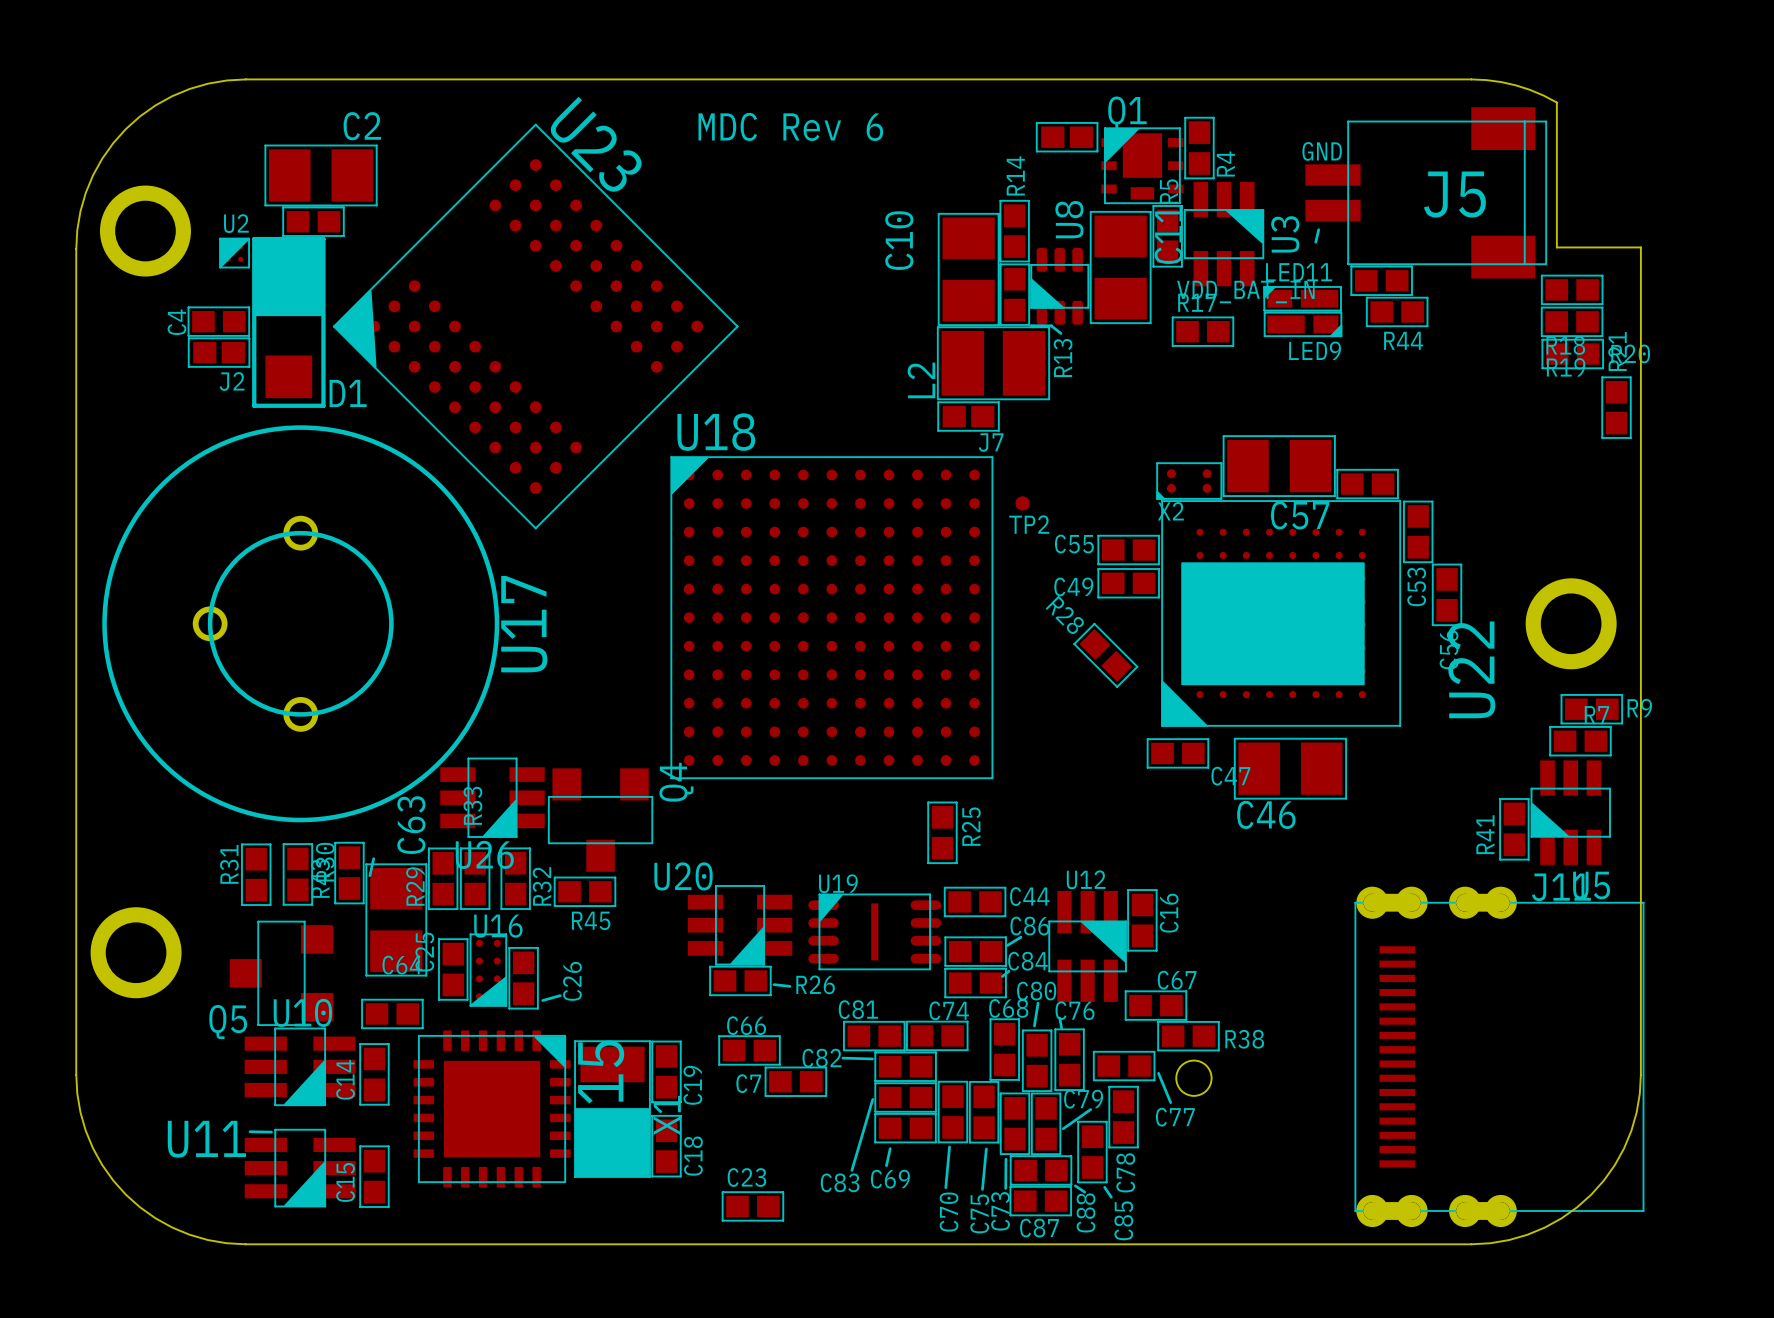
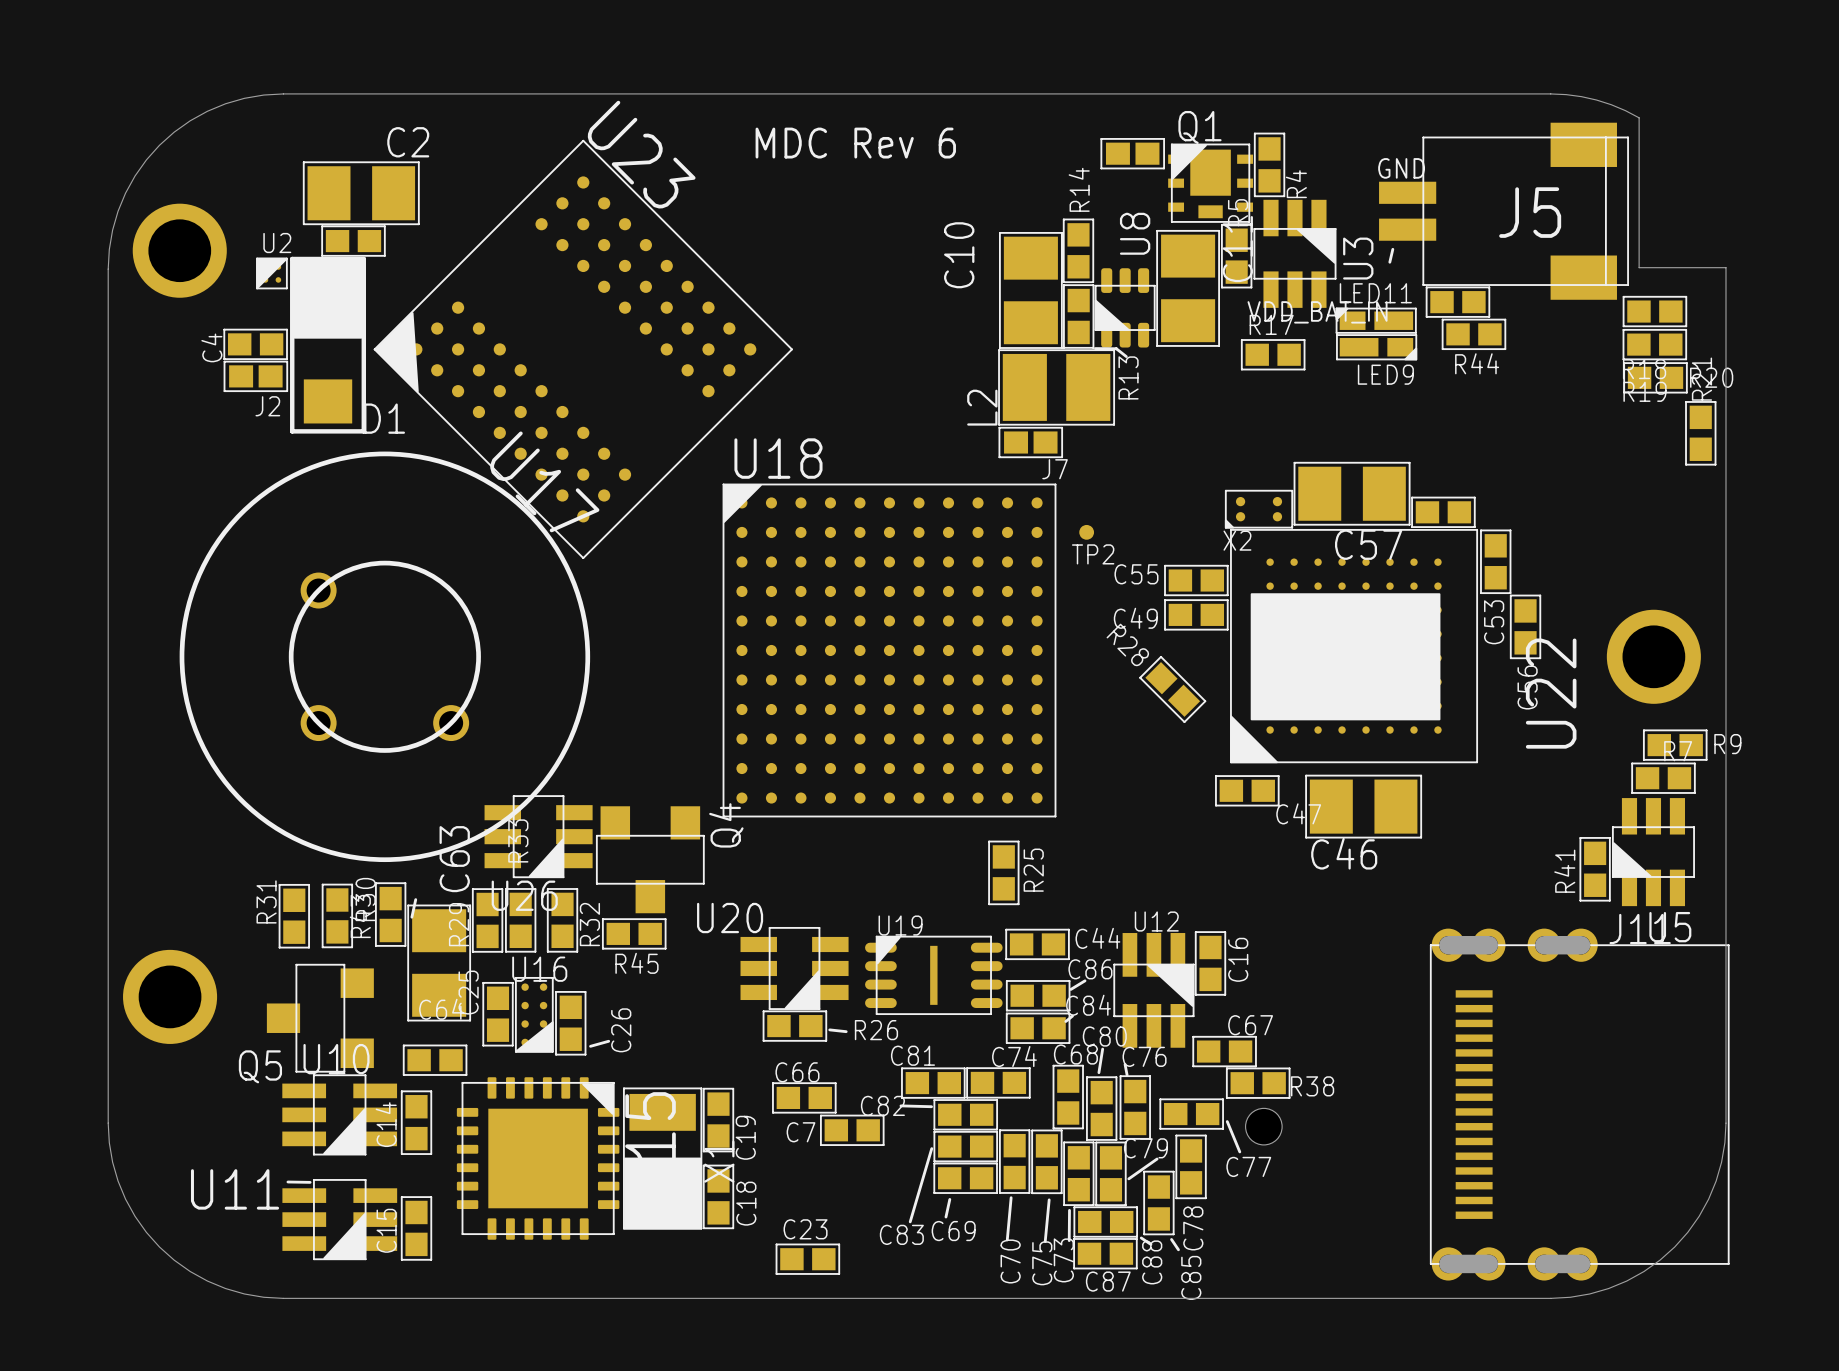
U17 rotation: 0° (300, 623) -> 45° counterclockwise (384, 656)

